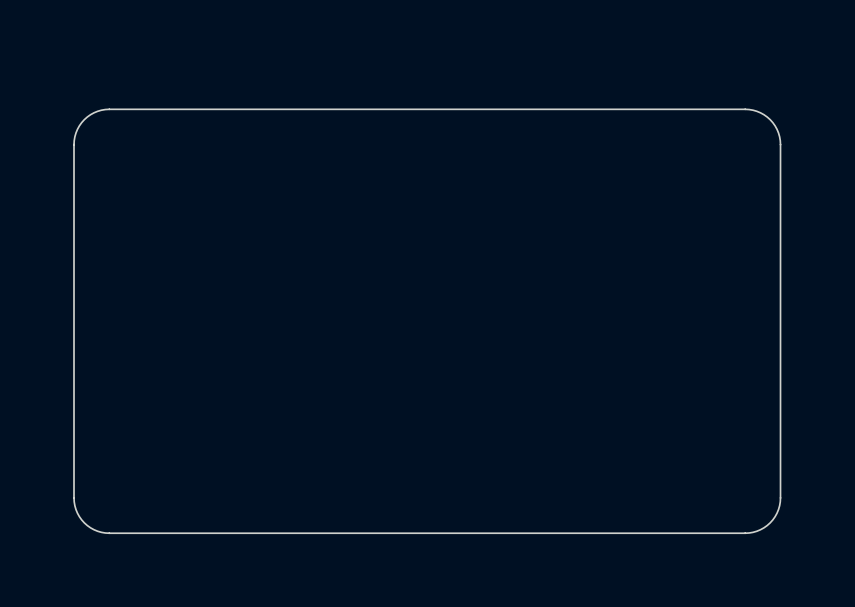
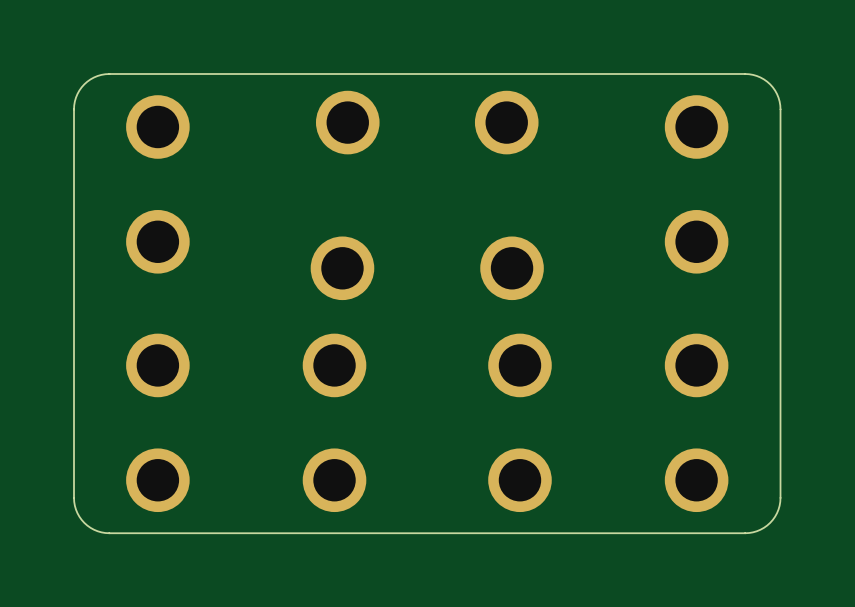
part: none -> (347, 122)
part: none -> (506, 122)
part: none -> (157, 126)
part: none -> (696, 126)
board edge: (780, 144) (777, 129) (770, 119) (760, 112) (745, 109) (109, 109) (93, 112) (84, 119) (75, 132) (74, 144) -> (780, 144) (780, 105) (777, 93) (763, 79) (745, 74) (105, 74) (87, 81) (77, 93) (74, 105) (74, 144)
part: none -> (157, 241)
part: none -> (696, 241)
part: none -> (342, 268)
part: none -> (512, 268)
part: none -> (157, 365)
part: none -> (334, 365)
part: none -> (519, 365)
part: none -> (696, 365)
part: none -> (157, 480)
part: none -> (334, 480)
part: none -> (519, 480)
part: none -> (696, 480)

